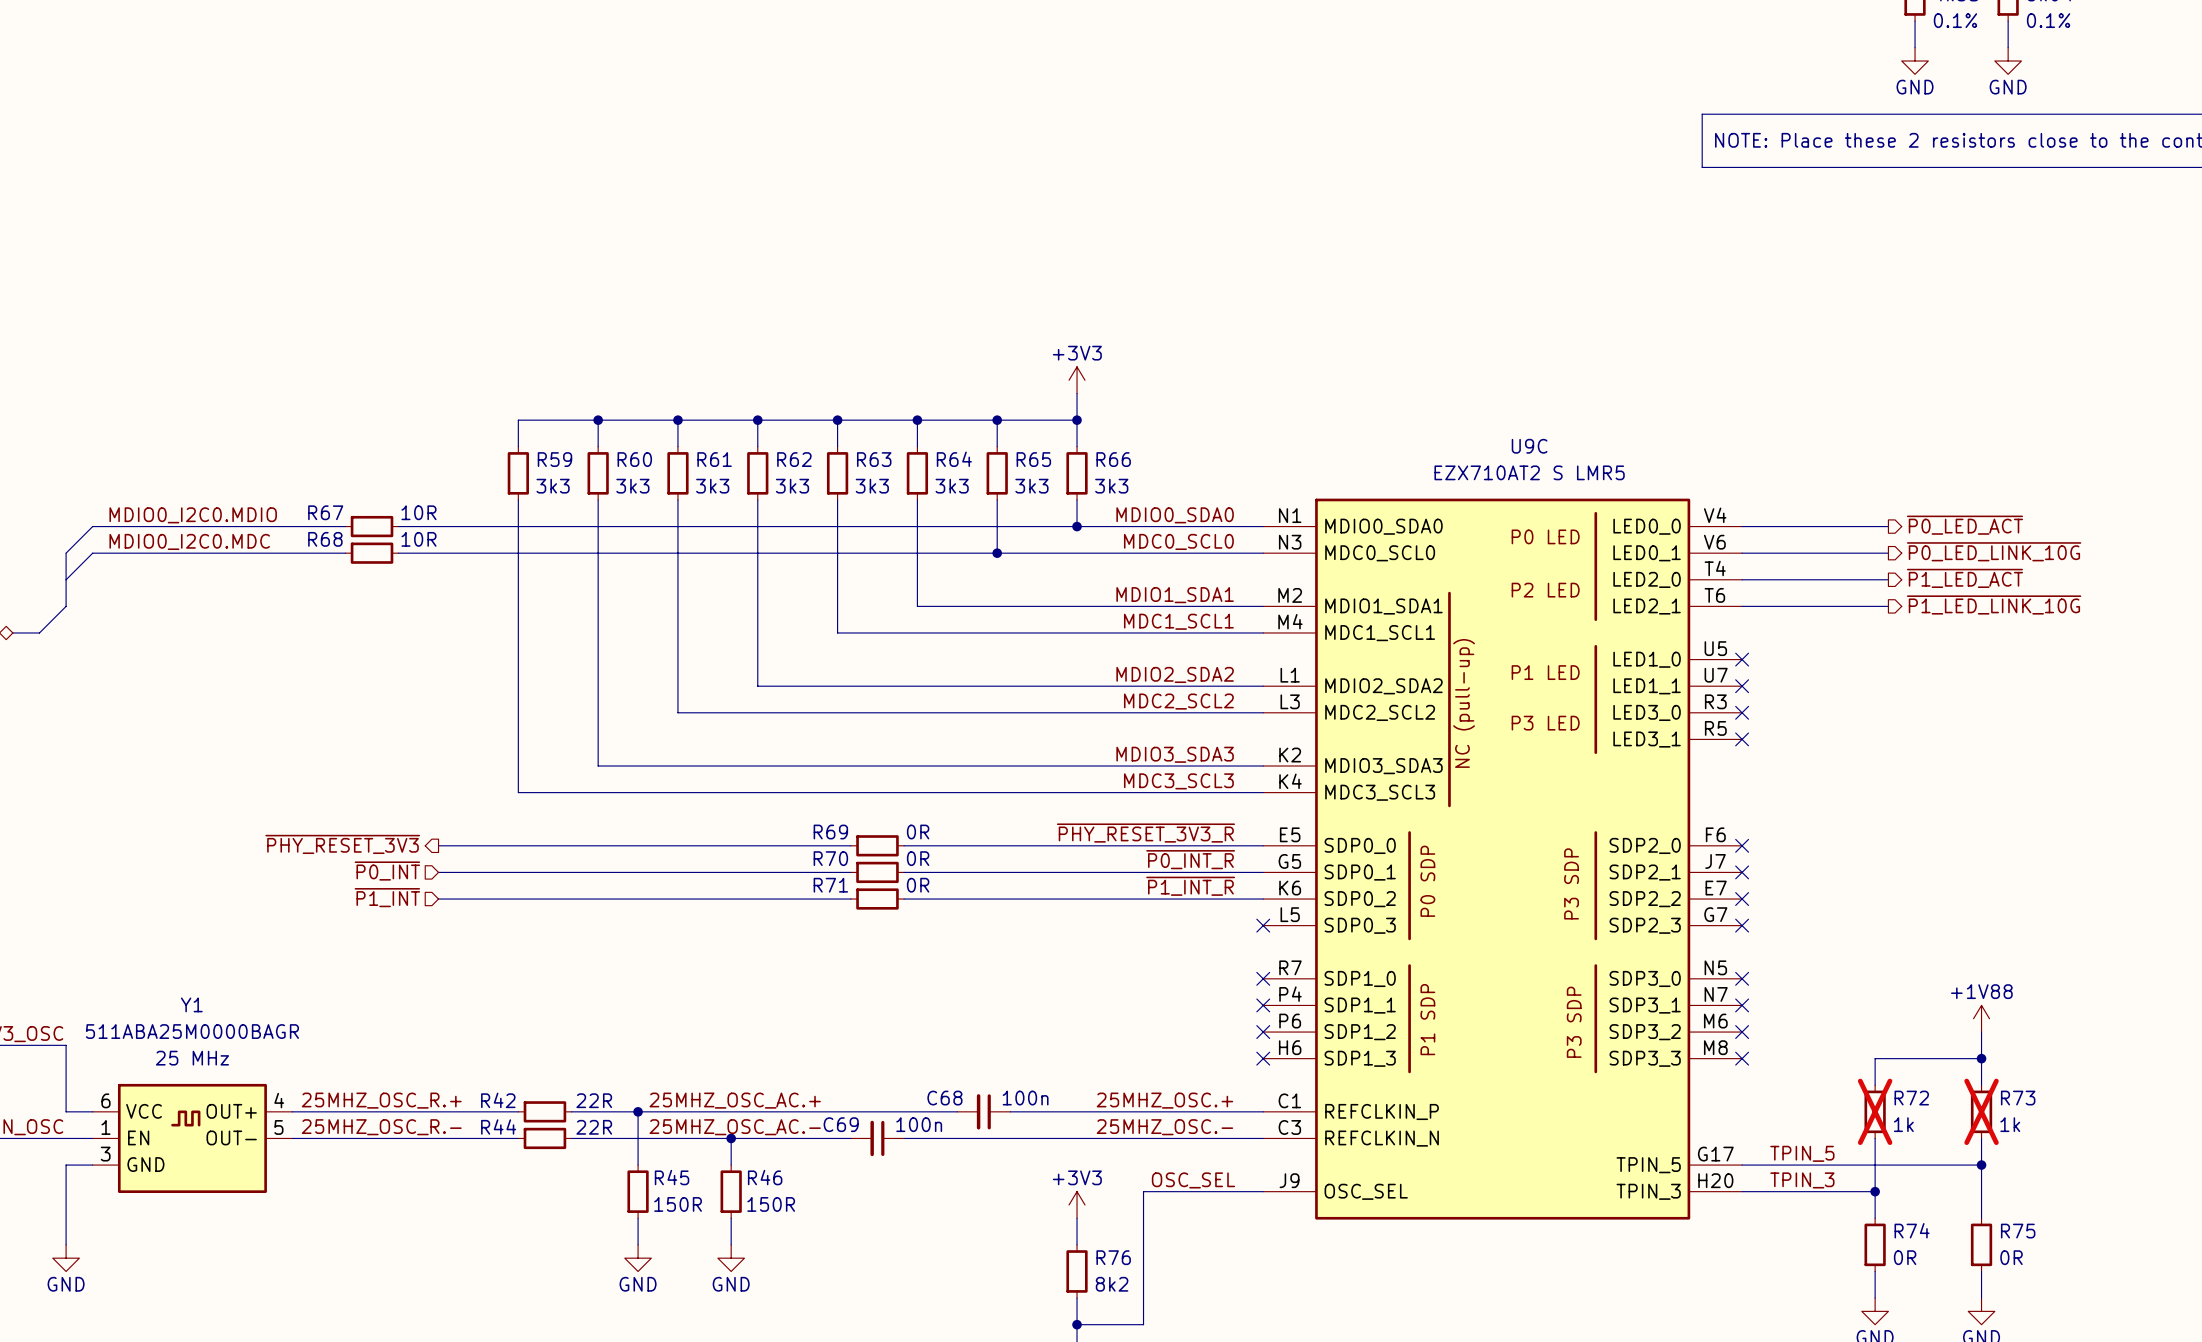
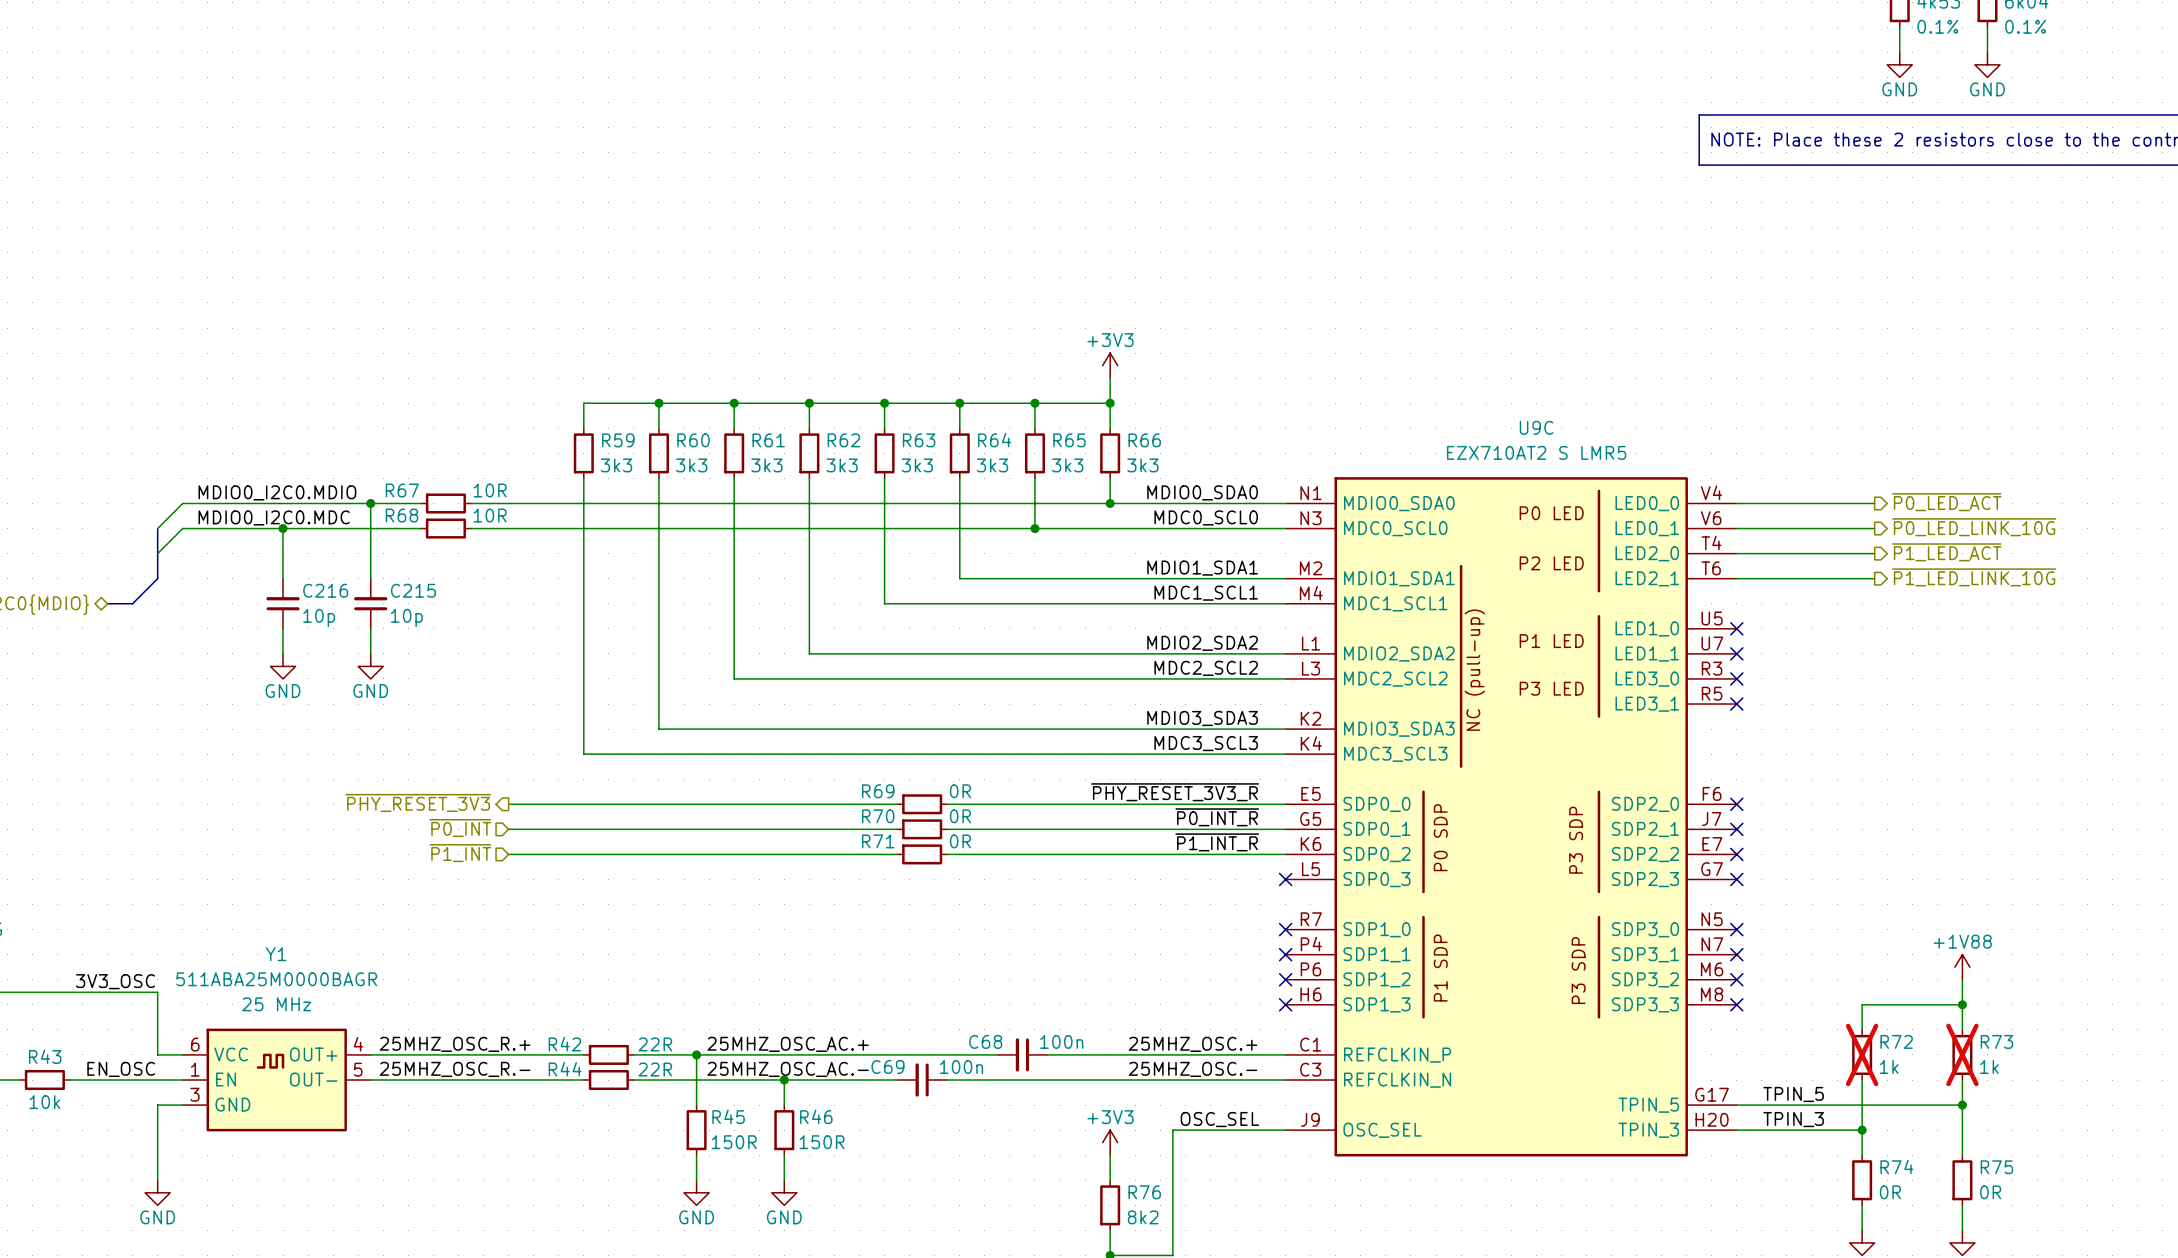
wire: none -> (370, 503) (370, 578)
junction: none -> (370, 503)
wire: none -> (283, 528) (283, 578)
junction: none -> (283, 528)
C216: none -> (283, 603)
C215: none -> (370, 603)
wire: none -> (283, 628) (283, 653)
wire: none -> (370, 628) (370, 653)
power symbol: none -> GND (283, 666)
power symbol: none -> GND (370, 666)

